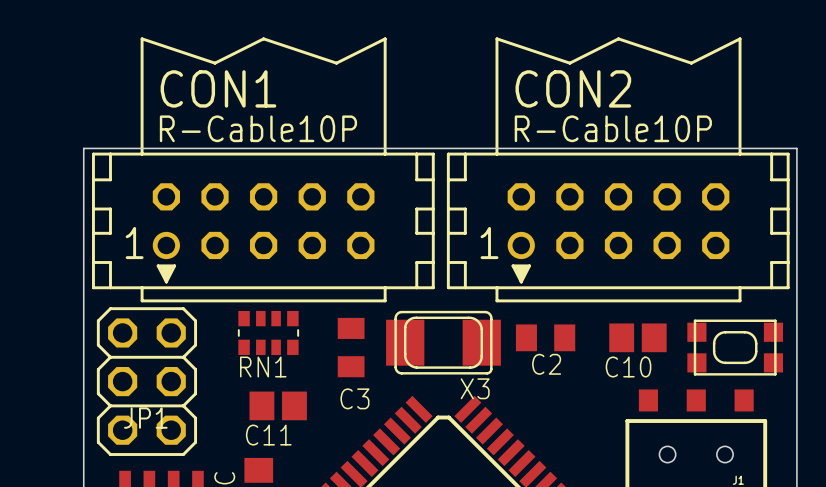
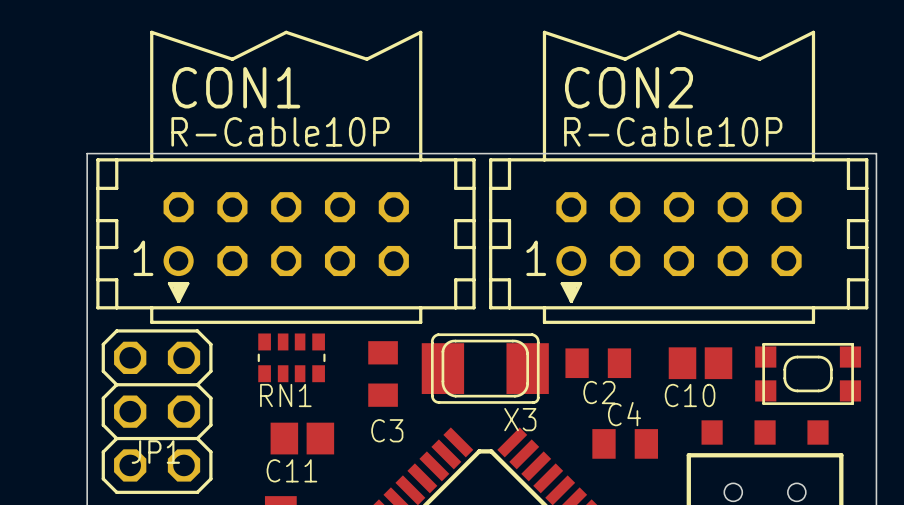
C4: none -> (625, 443)

